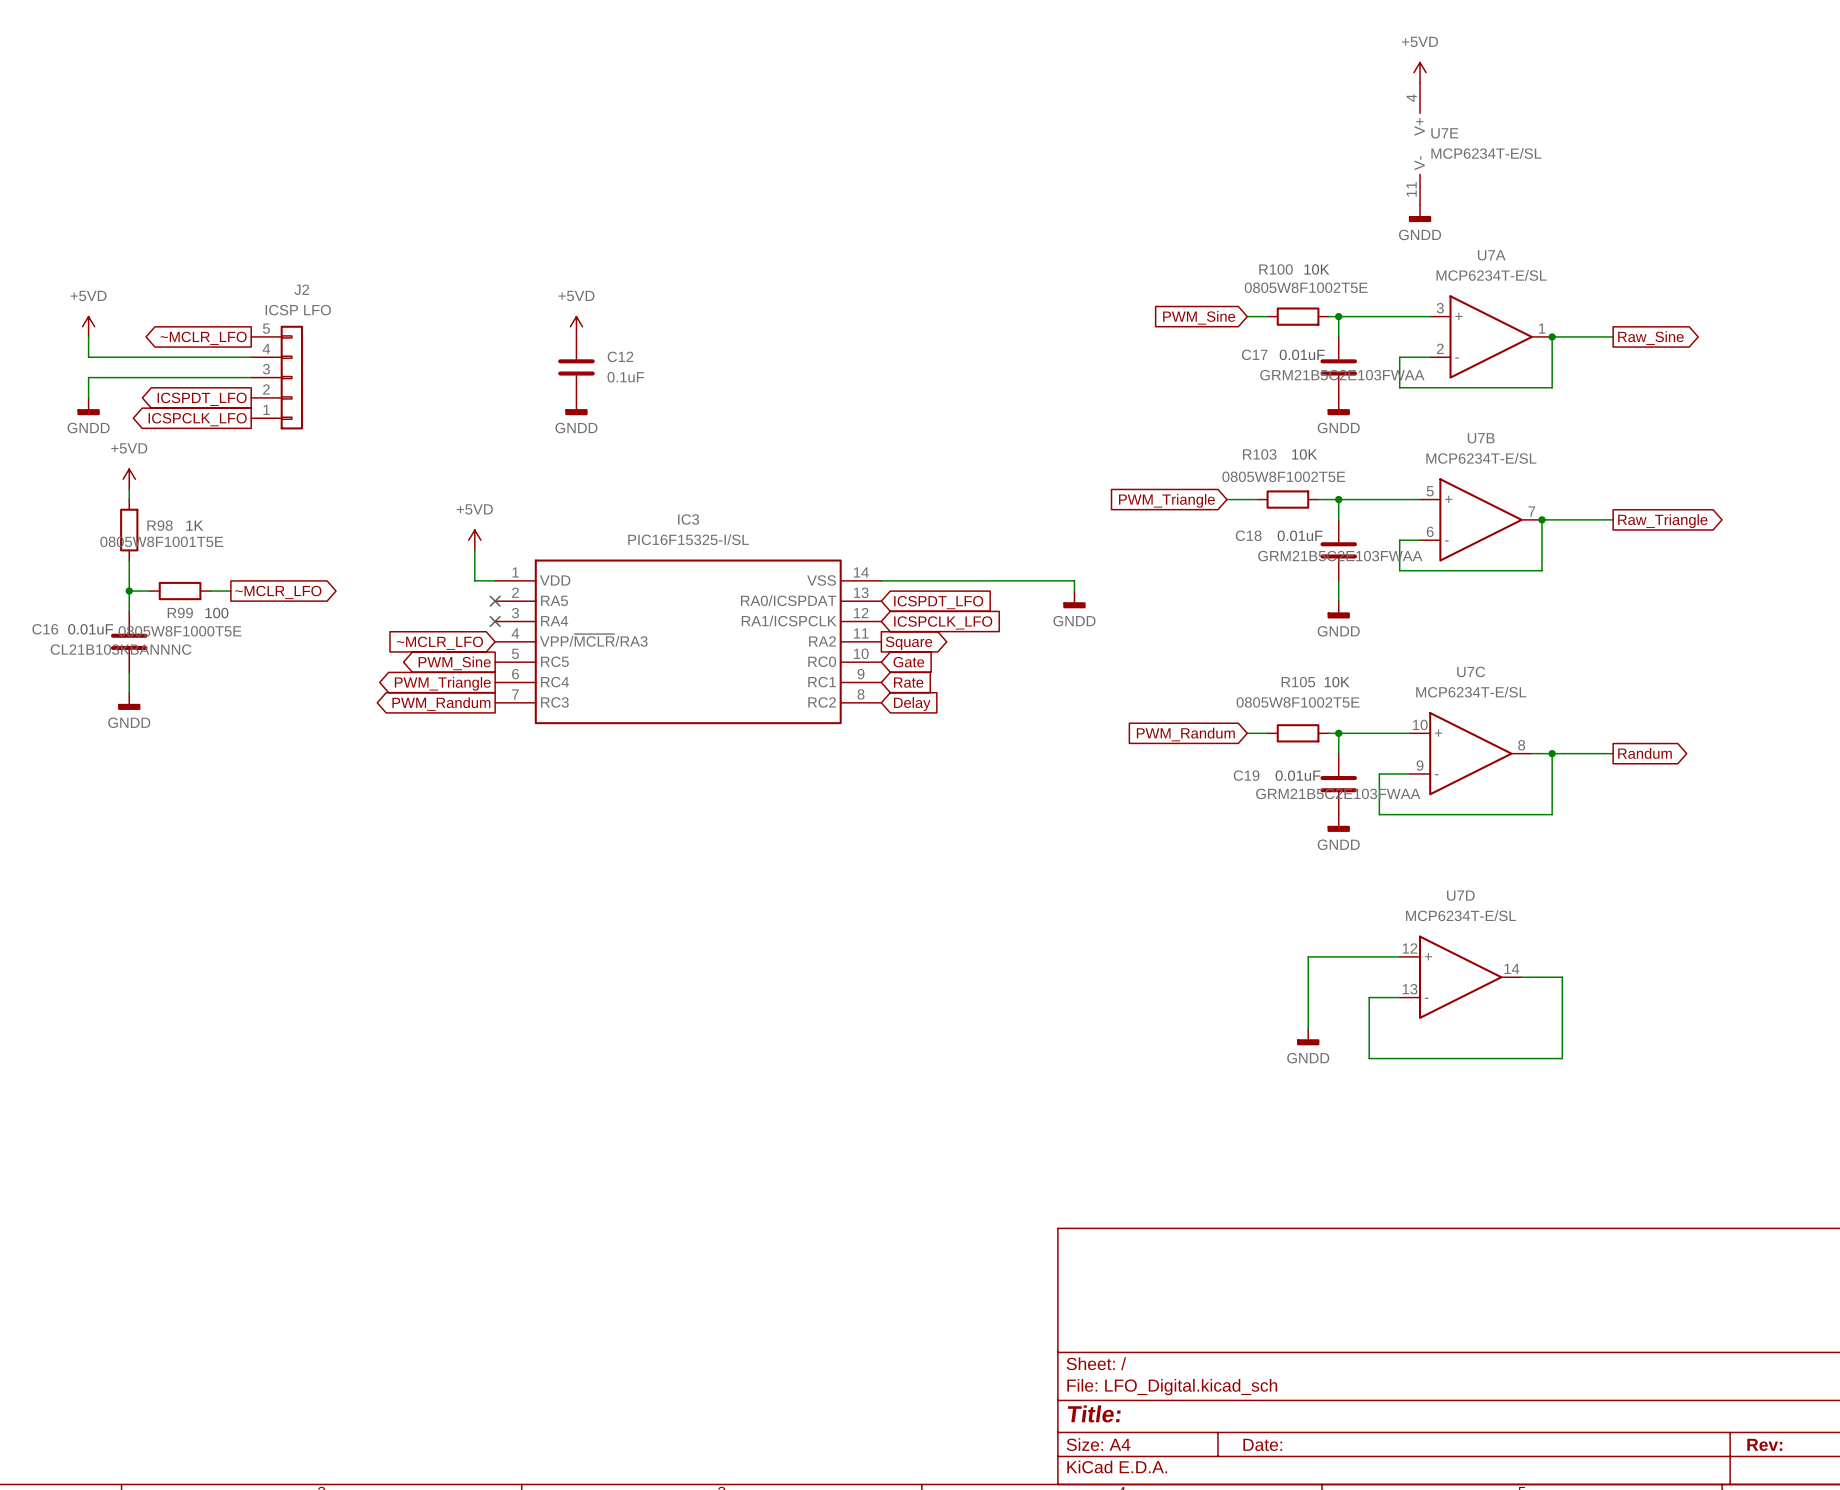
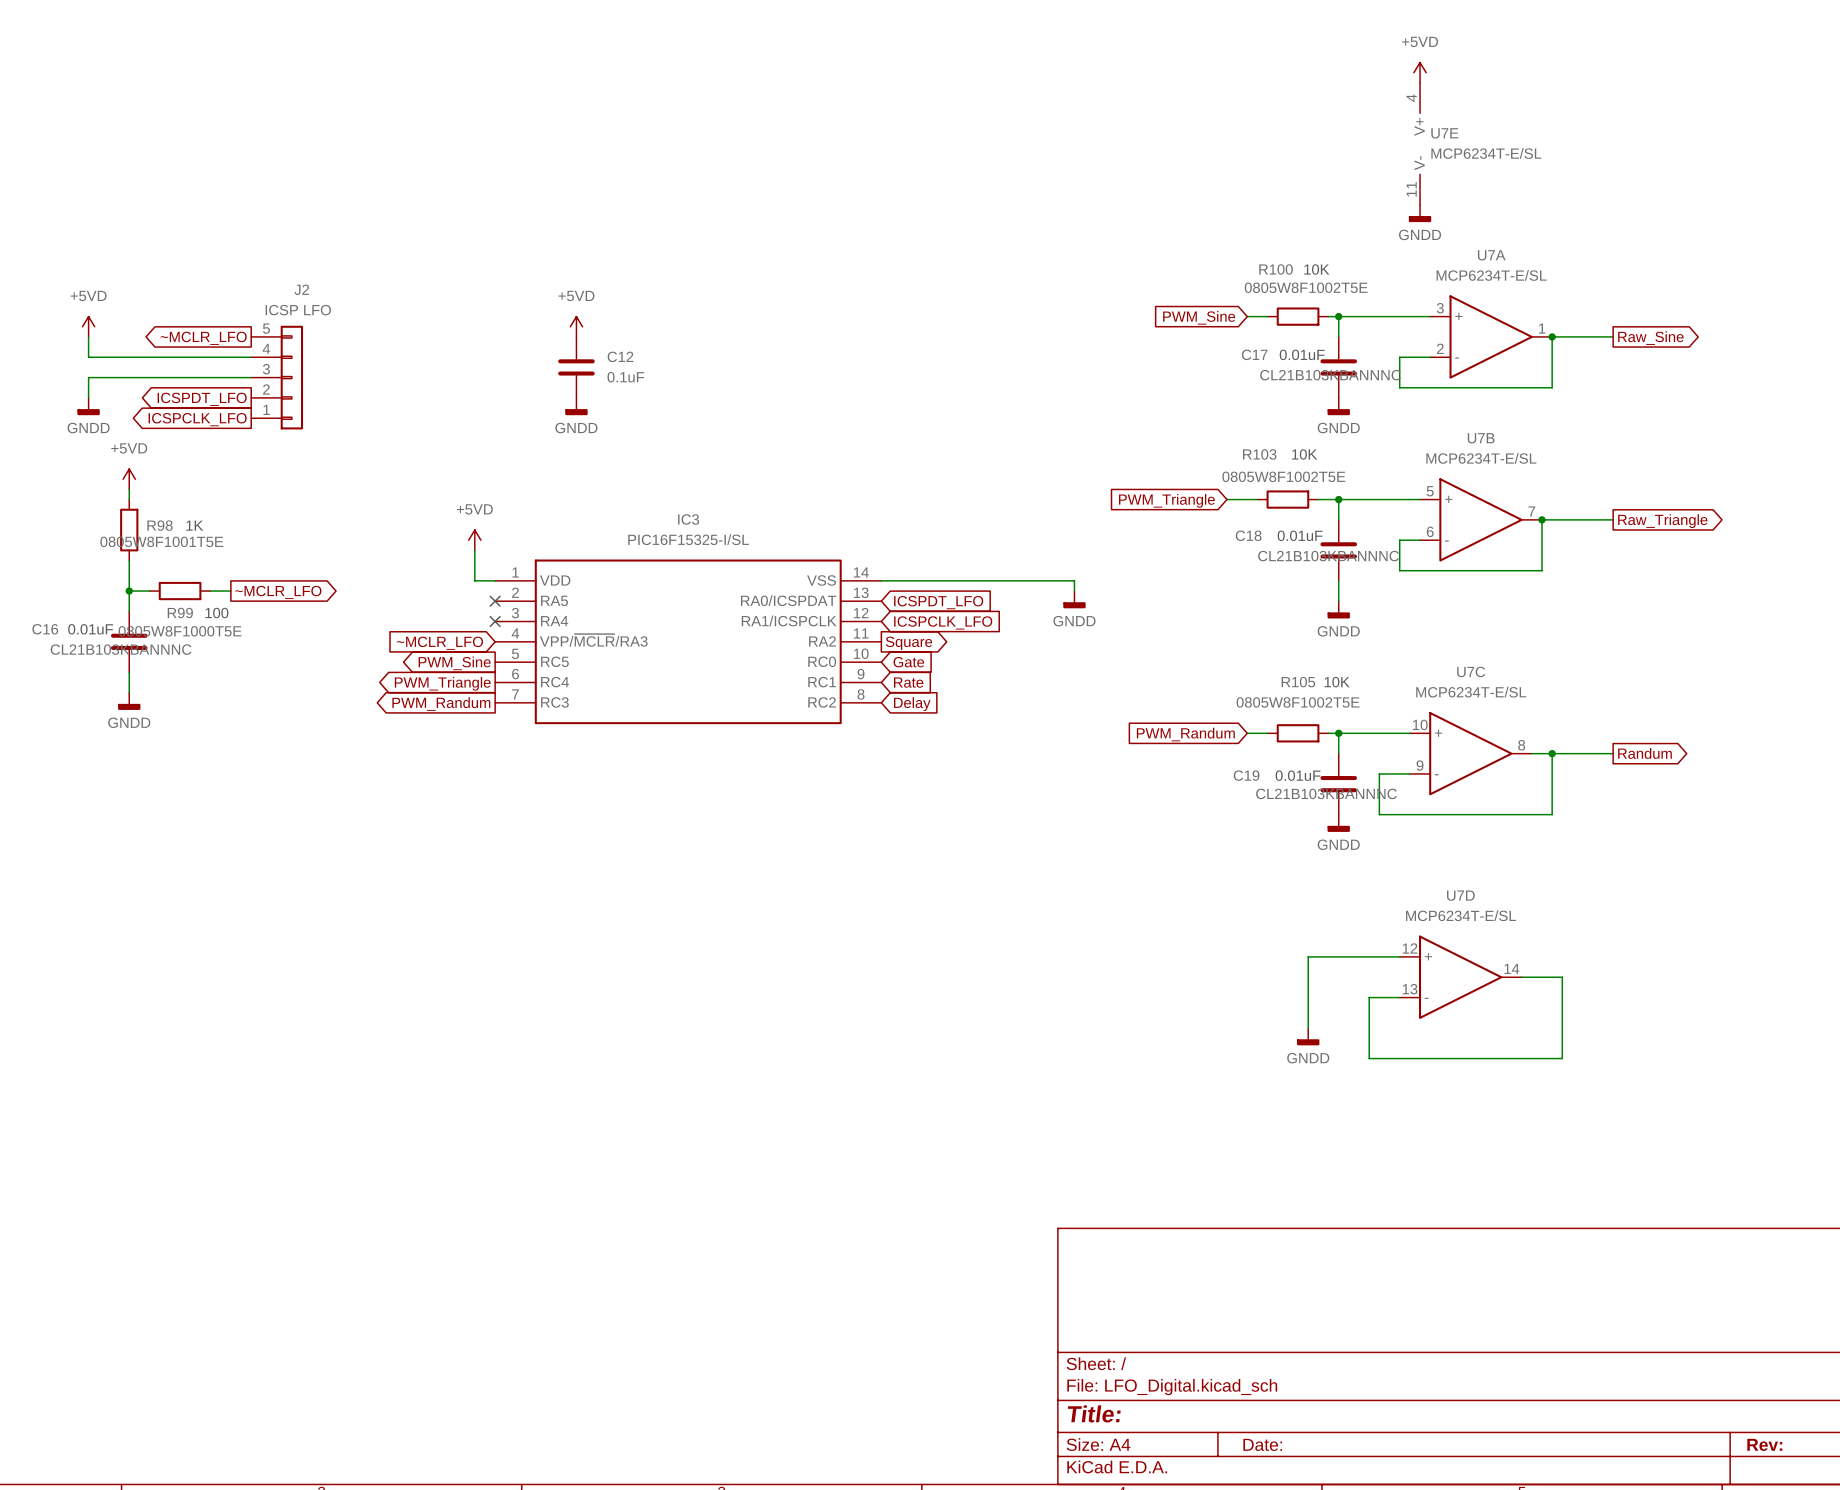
C17 value: GRM21B5C2E103FWAA (1342, 375) -> CL21B103KBANNNC (1330, 375)
C18 value: GRM21B5C2E103FWAA (1340, 556) -> CL21B103KBANNNC (1328, 556)
C19 value: GRM21B5C2E103FWAA (1338, 793) -> CL21B103KBANNNC (1326, 793)

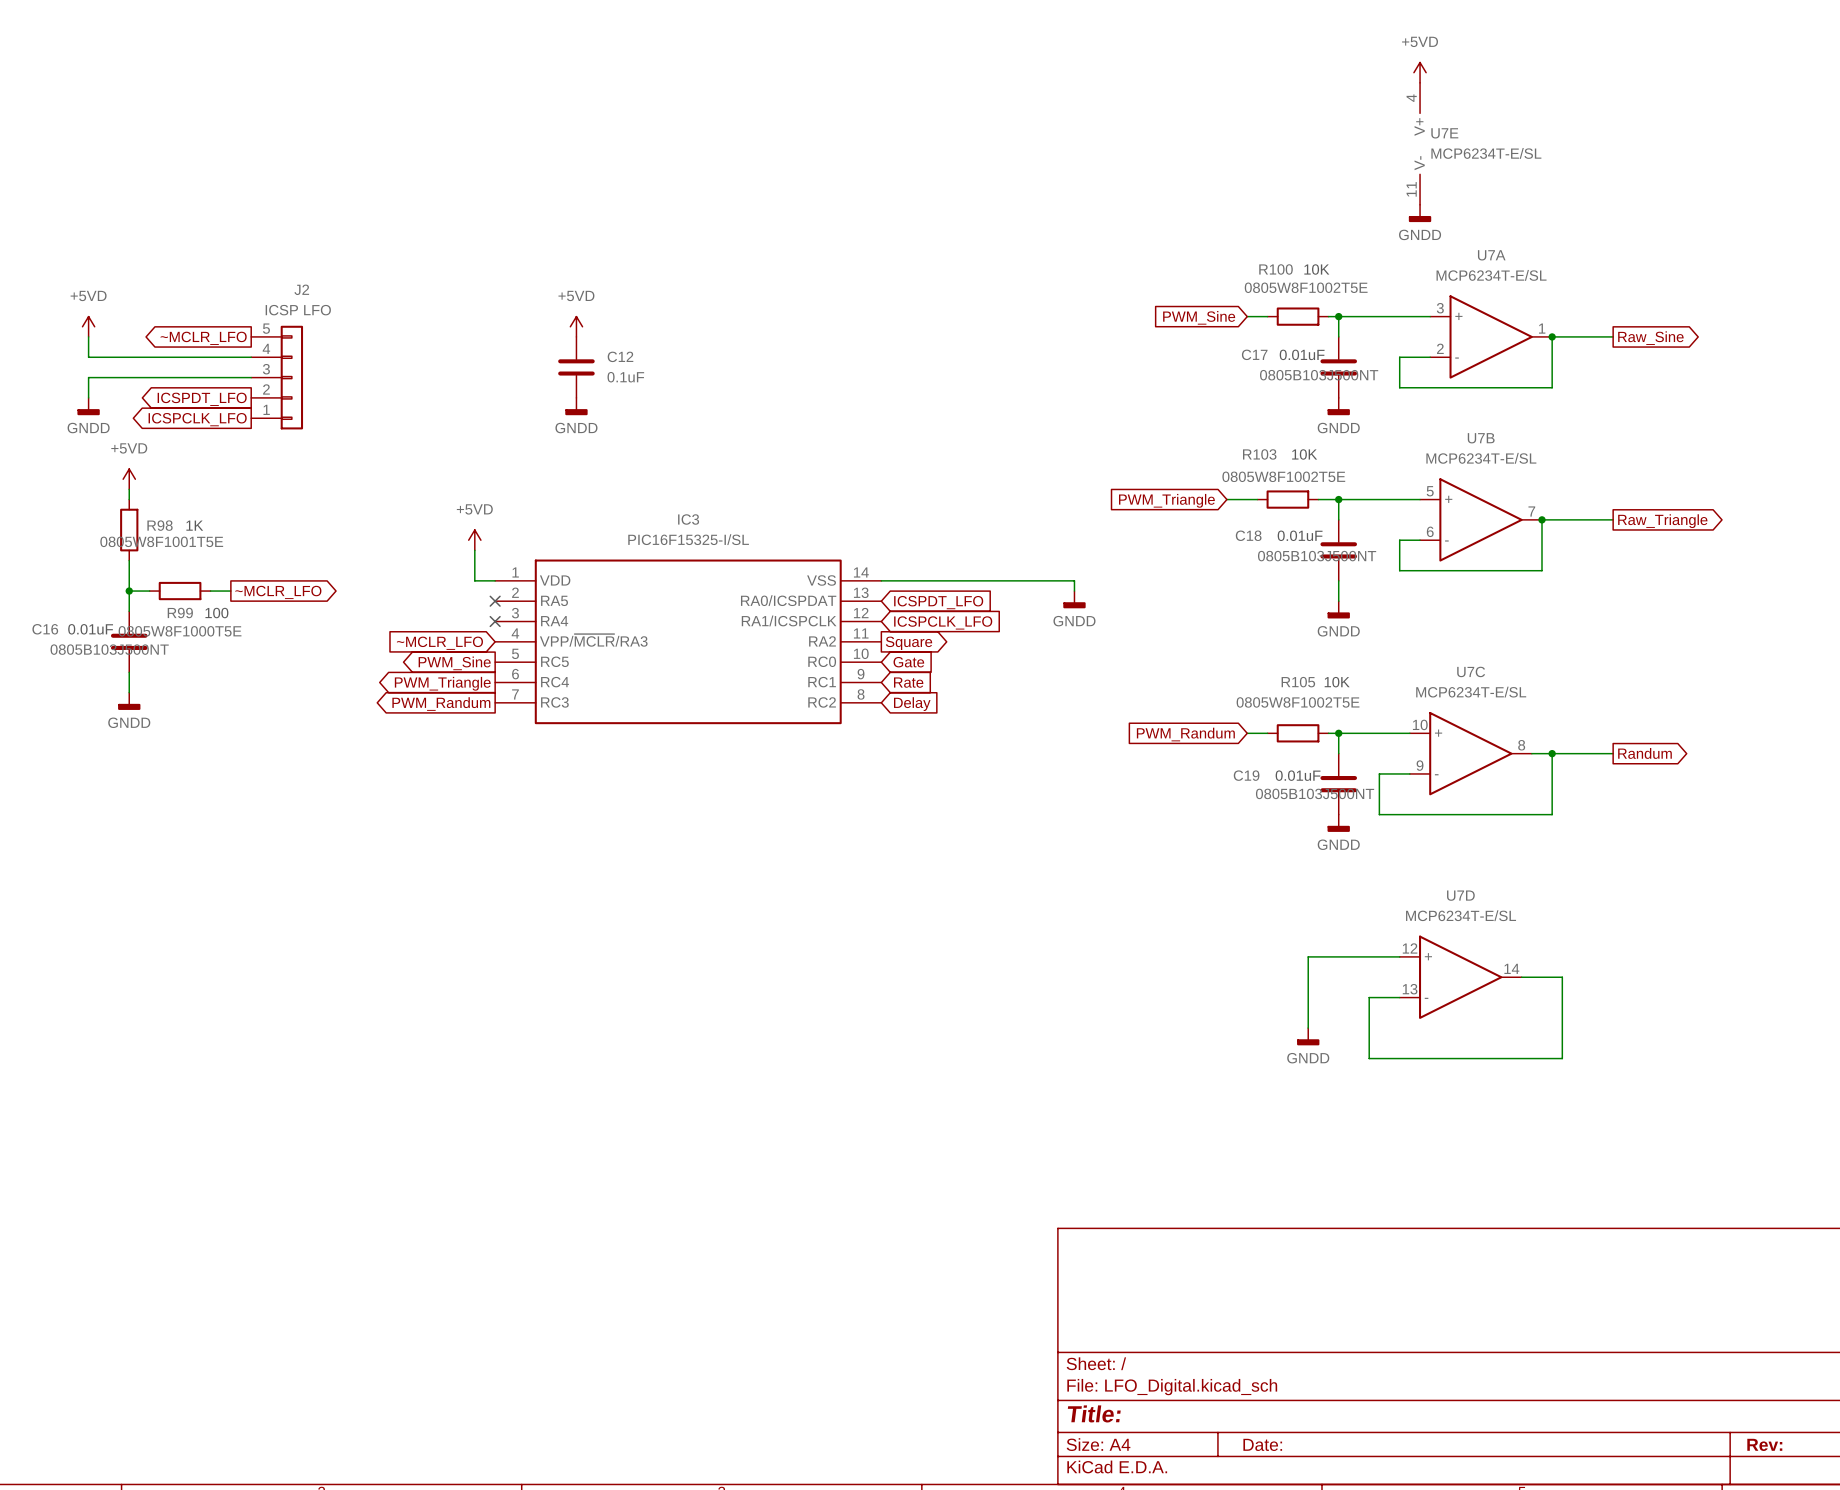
C17 value: CL21B103KBANNNC (1330, 375) -> 0805B103J500NT (1319, 375)
C18 value: CL21B103KBANNNC (1328, 556) -> 0805B103J500NT (1317, 556)
C16 value: CL21B103KBANNNC (121, 649) -> 0805B103J500NT (109, 649)
C19 value: CL21B103KBANNNC (1326, 793) -> 0805B103J500NT (1315, 793)

